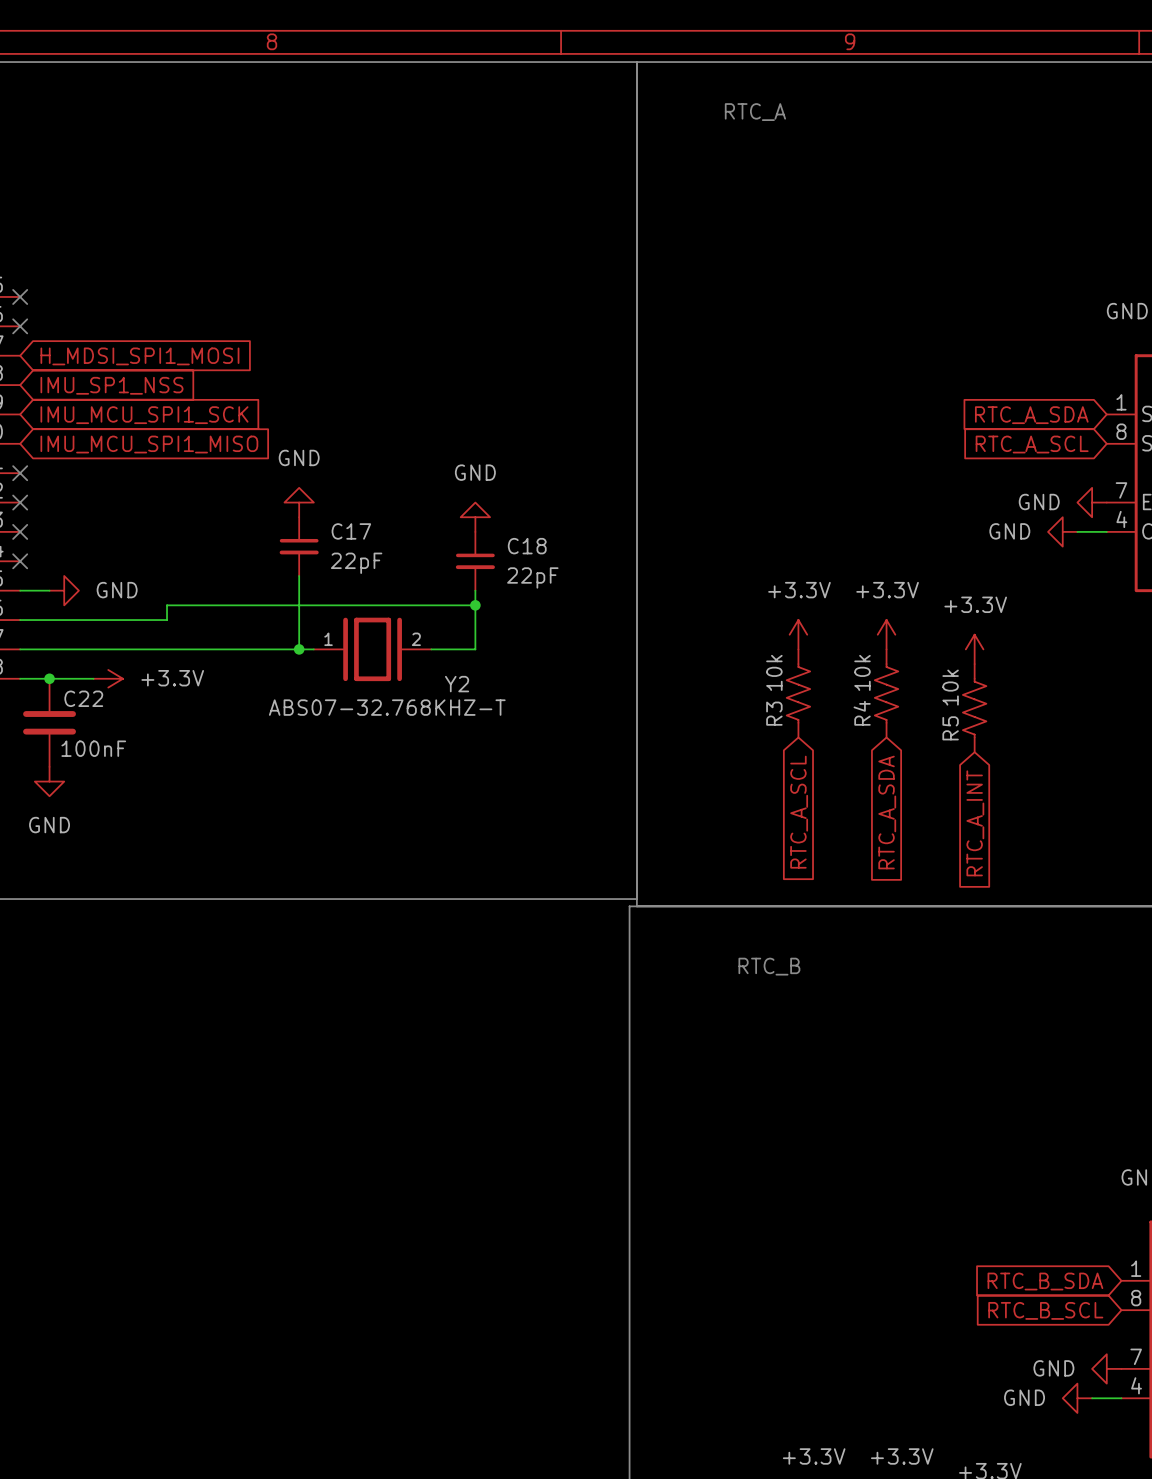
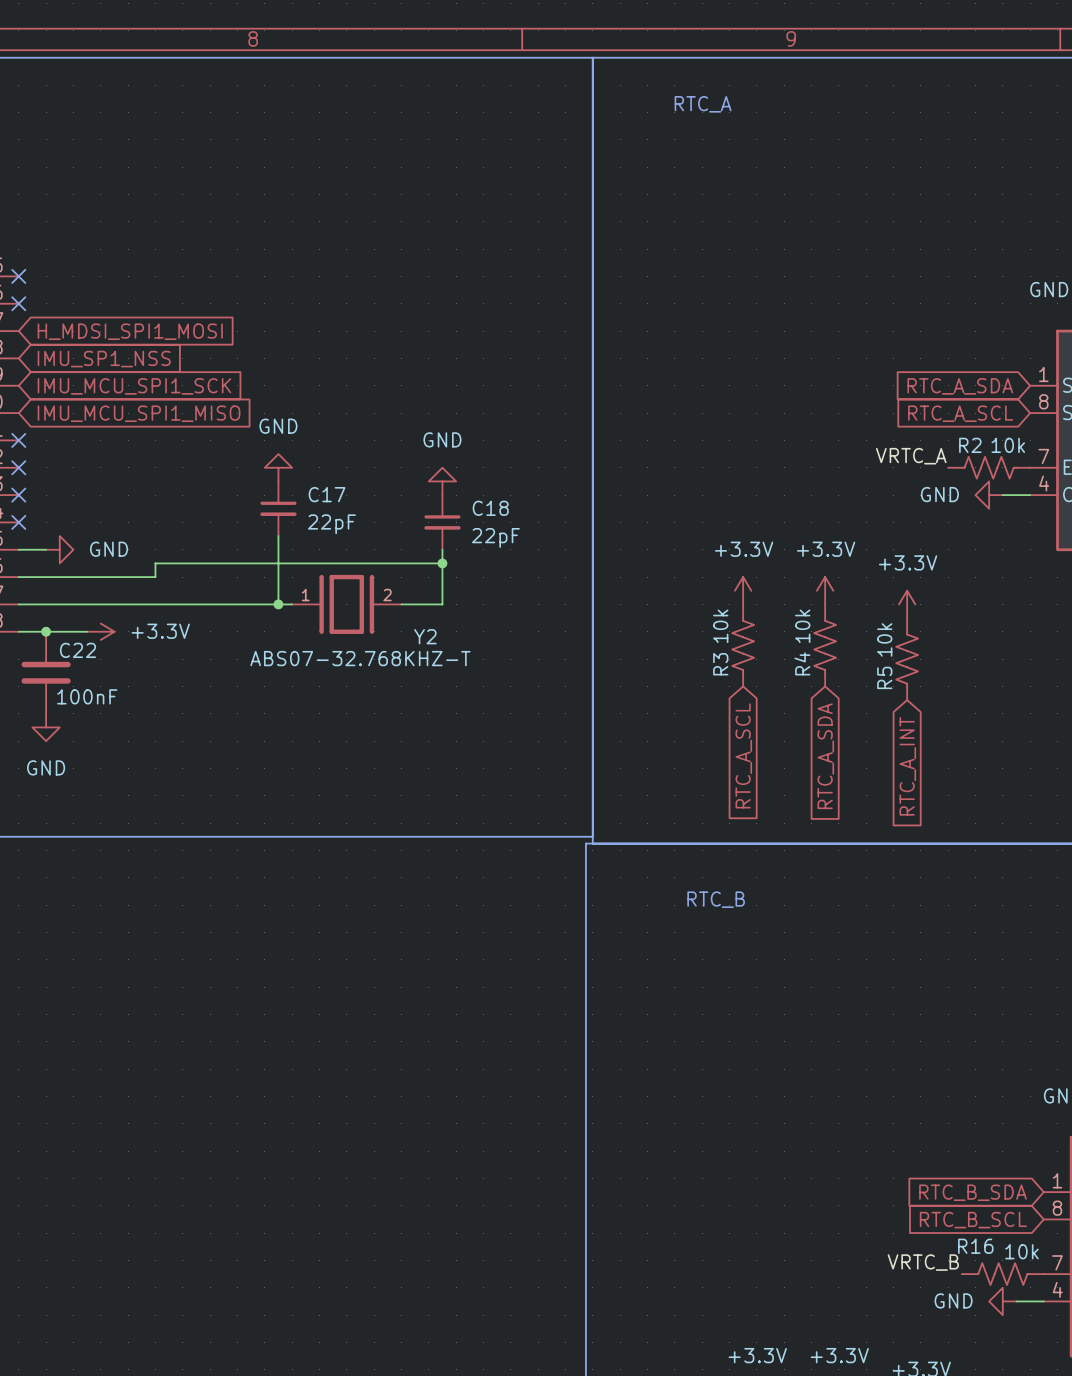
label: none -> VRTC_A (911, 456)
R2: none -> 10k (989, 467)
power symbol: GND (1092, 502) -> none
label: none -> VRTC_B (923, 1262)
R16: none -> 10k (1002, 1274)
power symbol: GND (1106, 1368) -> none

